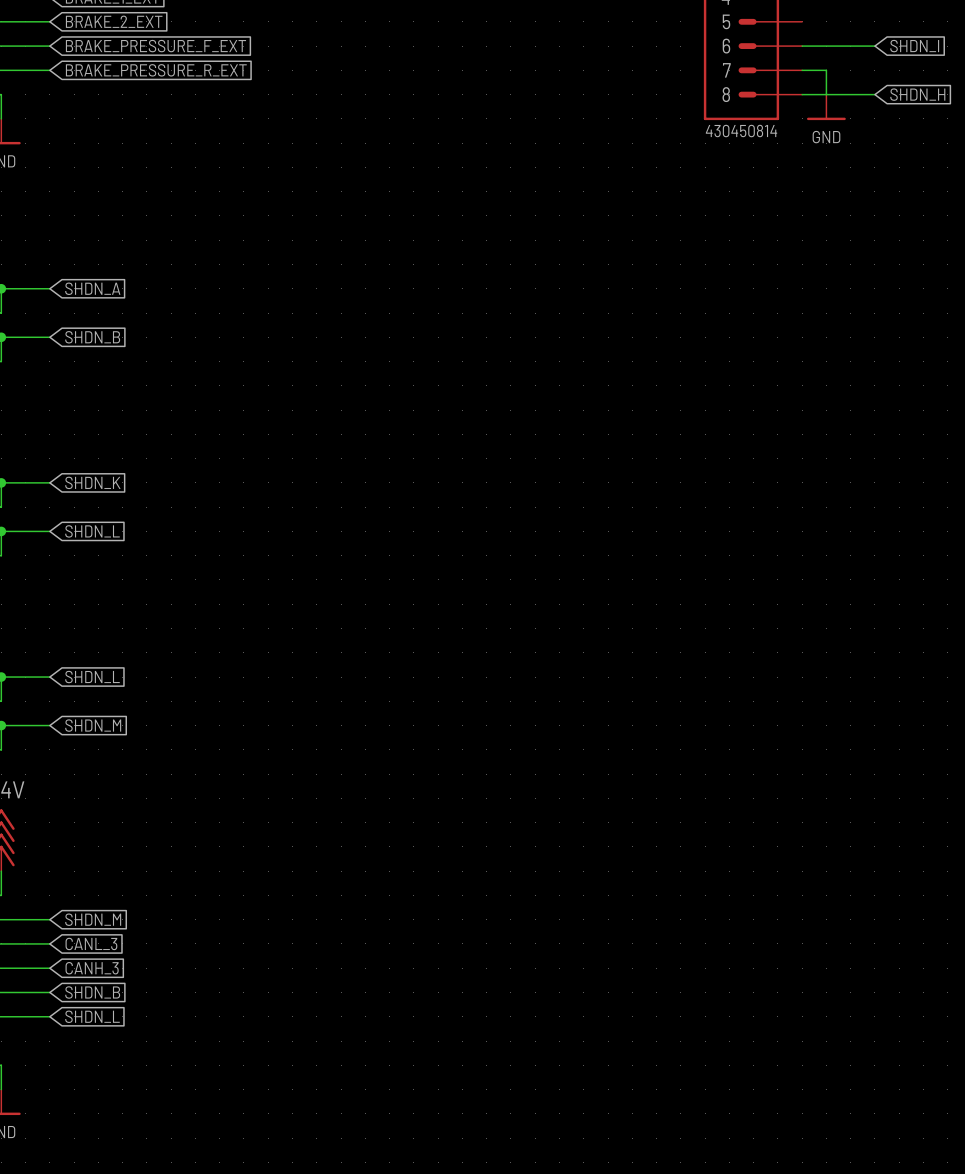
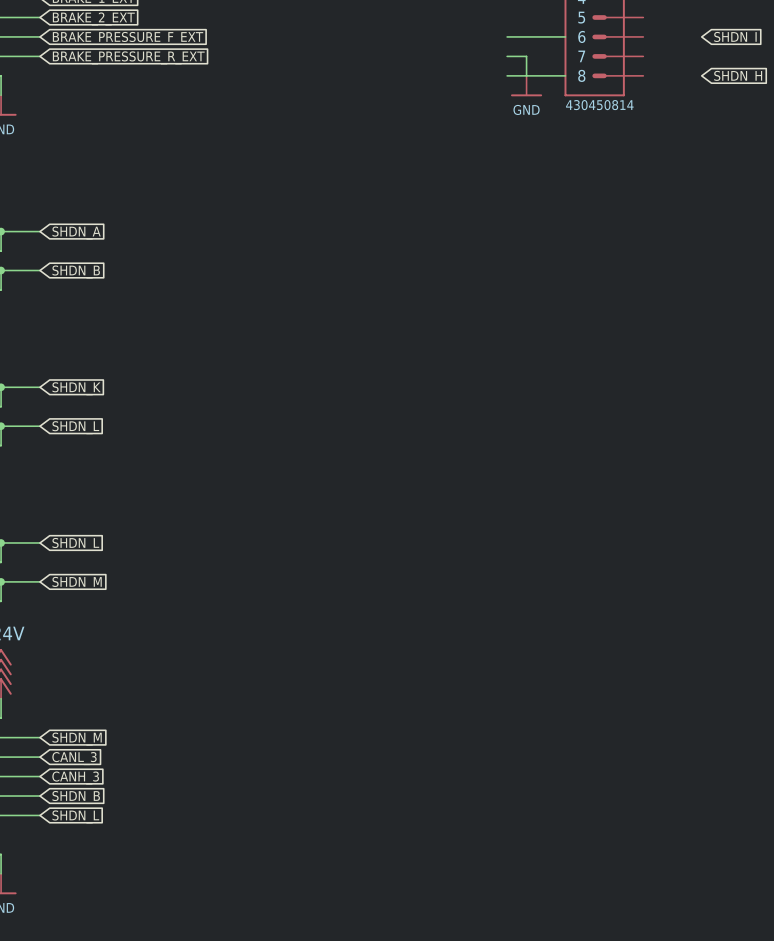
wire: (802, 46) (874, 46) -> (507, 36) (565, 36)
wire: (802, 70) (826, 70) (826, 94) -> (507, 56) (526, 56) (526, 75)
wire: (802, 94) (874, 94) -> (507, 75) (565, 75)
power symbol position: GND (826, 107) -> GND (526, 86)

